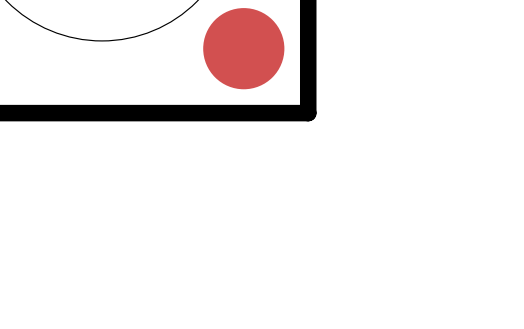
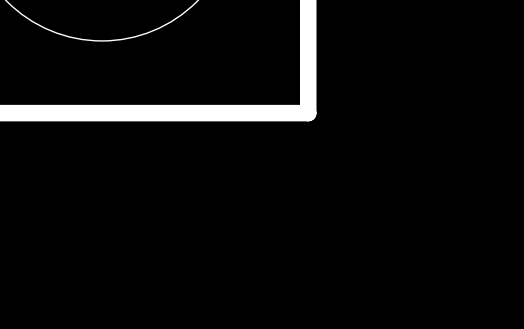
part: (243, 48) -> none

